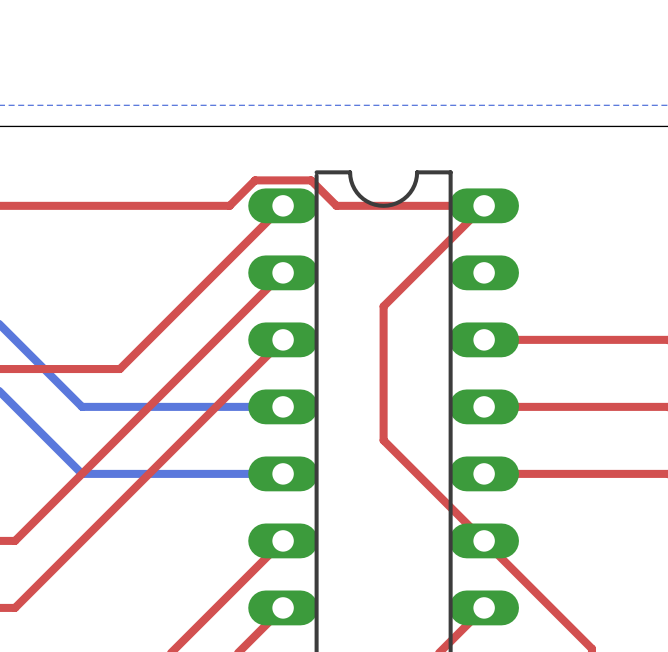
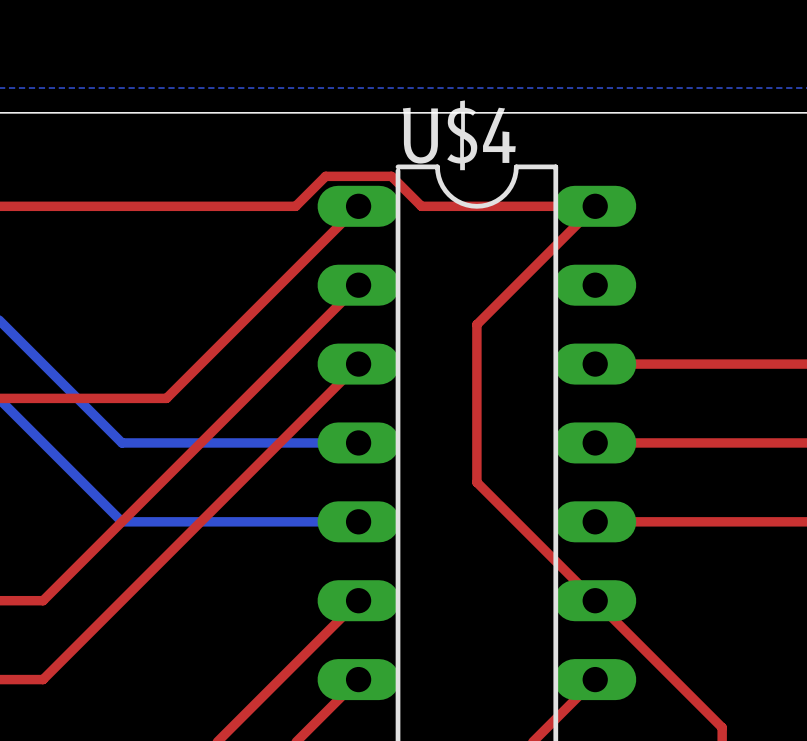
U$4 name: none -> U$4 (459, 135)

